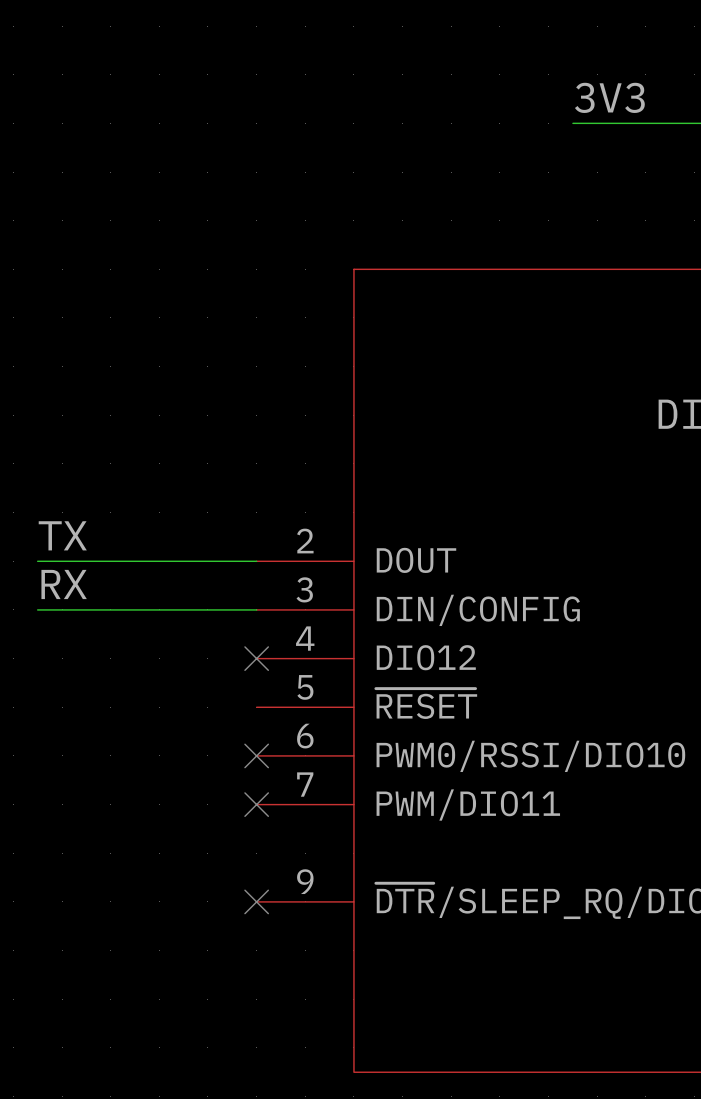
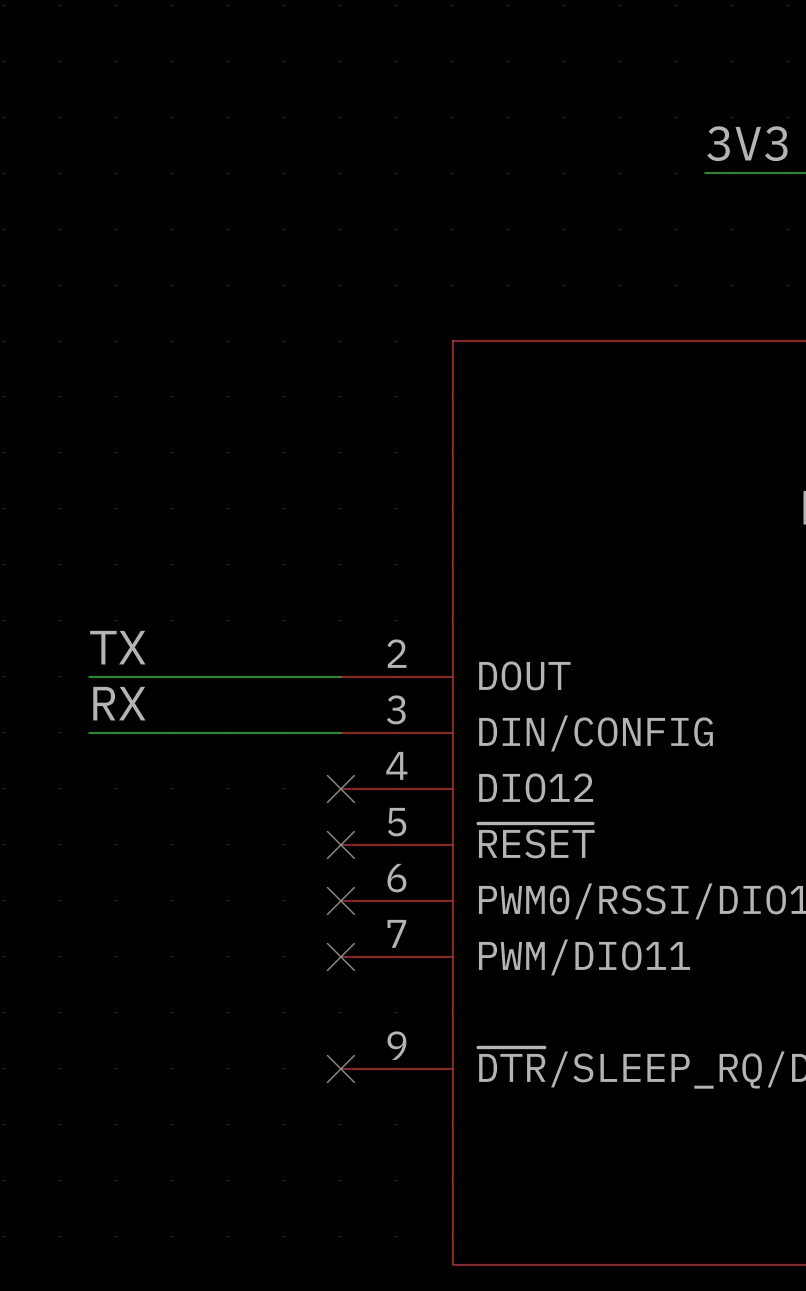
no-connect mark: none -> (340, 844)

